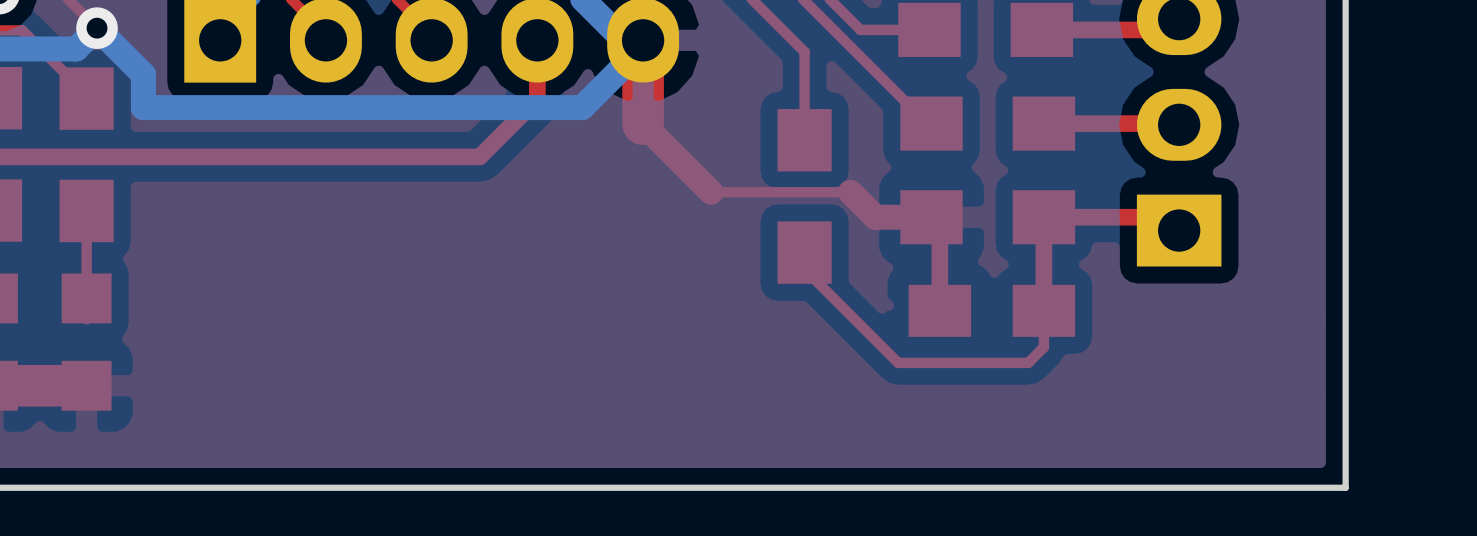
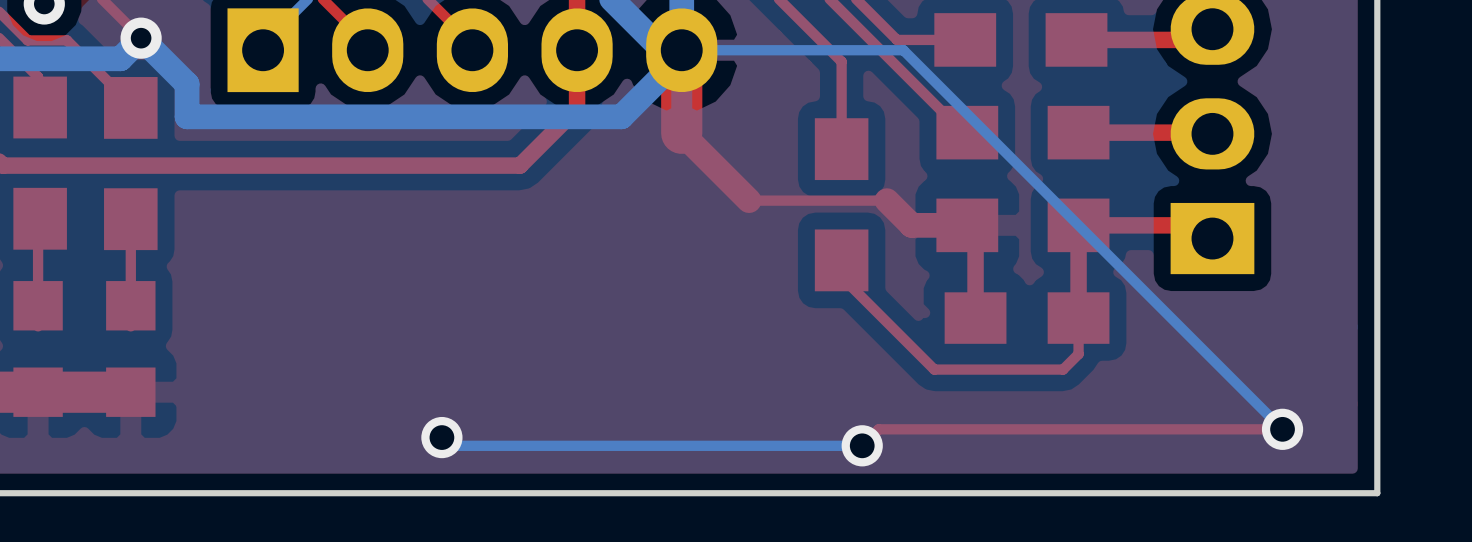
bottom track: none -> (681, 50) (903, 50) (1282, 429)
top track: none -> (1282, 429) (878, 429) (862, 445)
via: none -> (1282, 429)
bottom track: none -> (441, 437) (450, 445) (862, 445)
via: none -> (441, 437)
via: none -> (862, 445)

